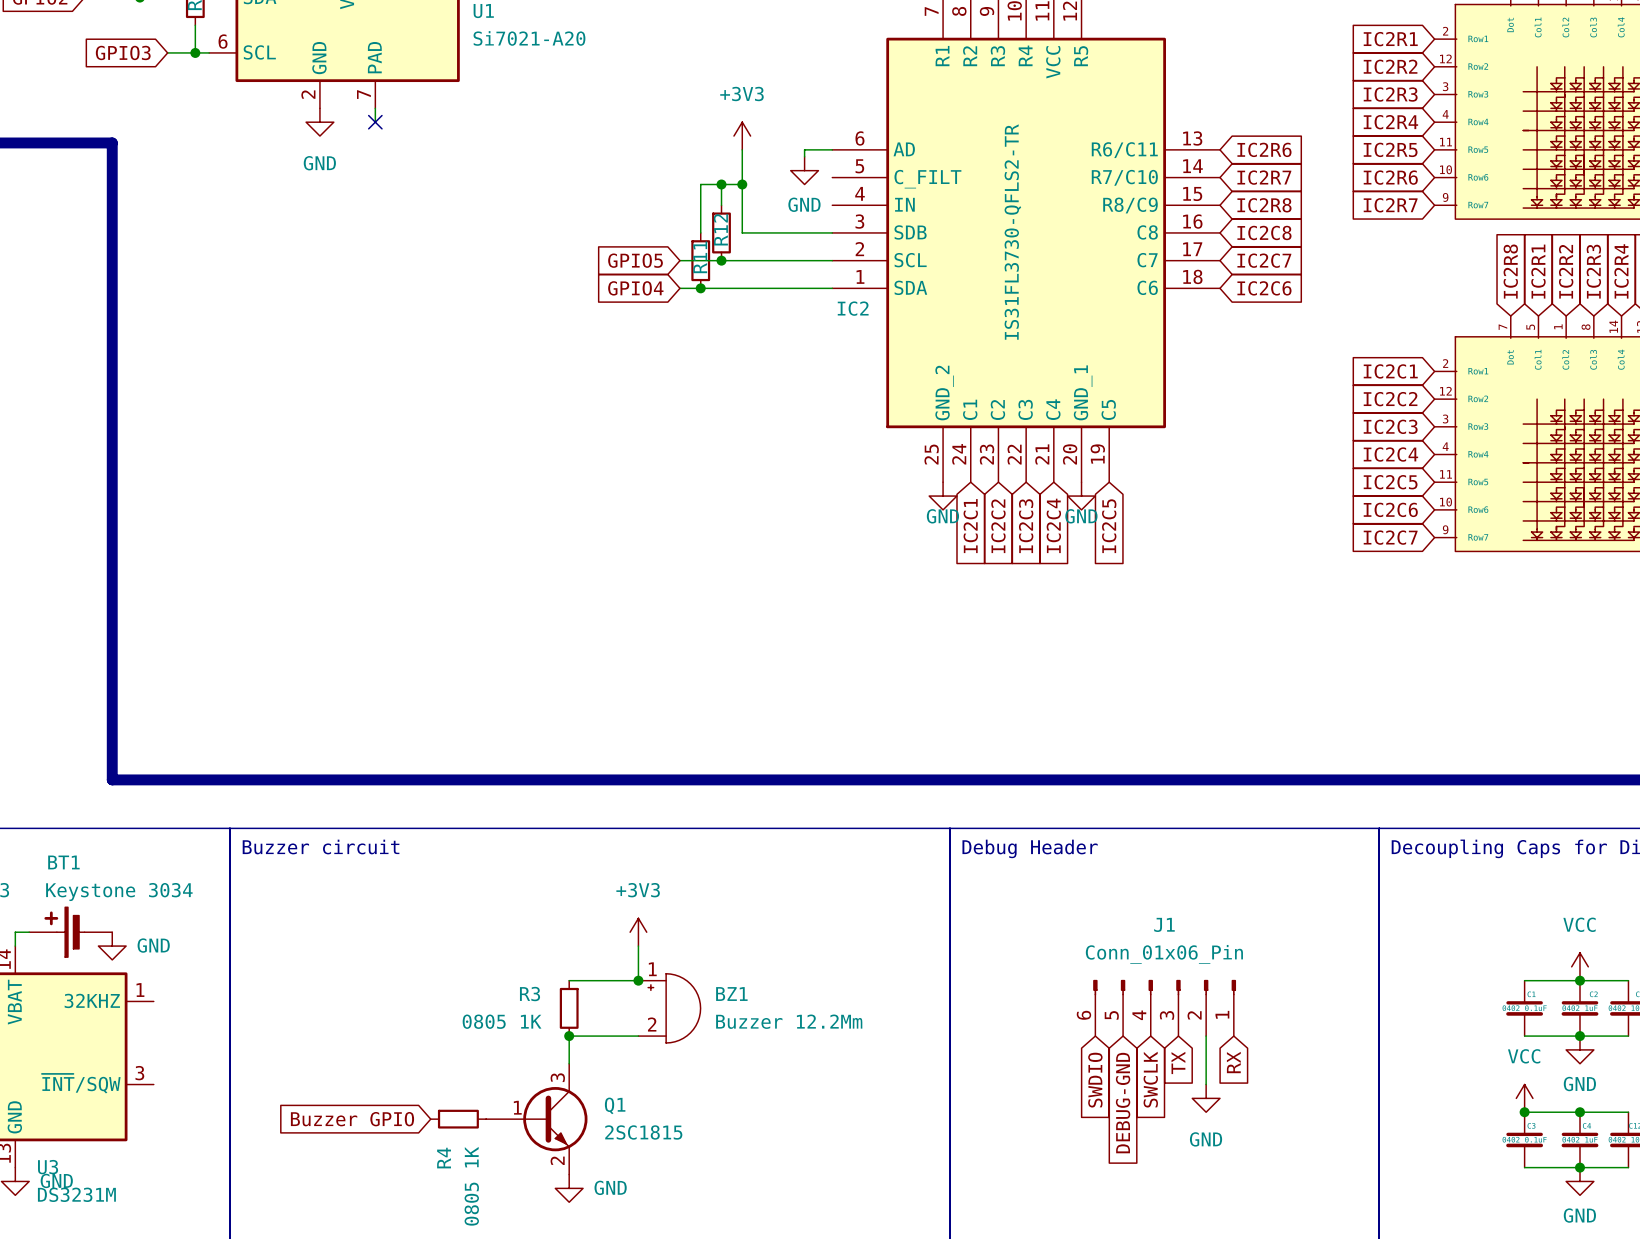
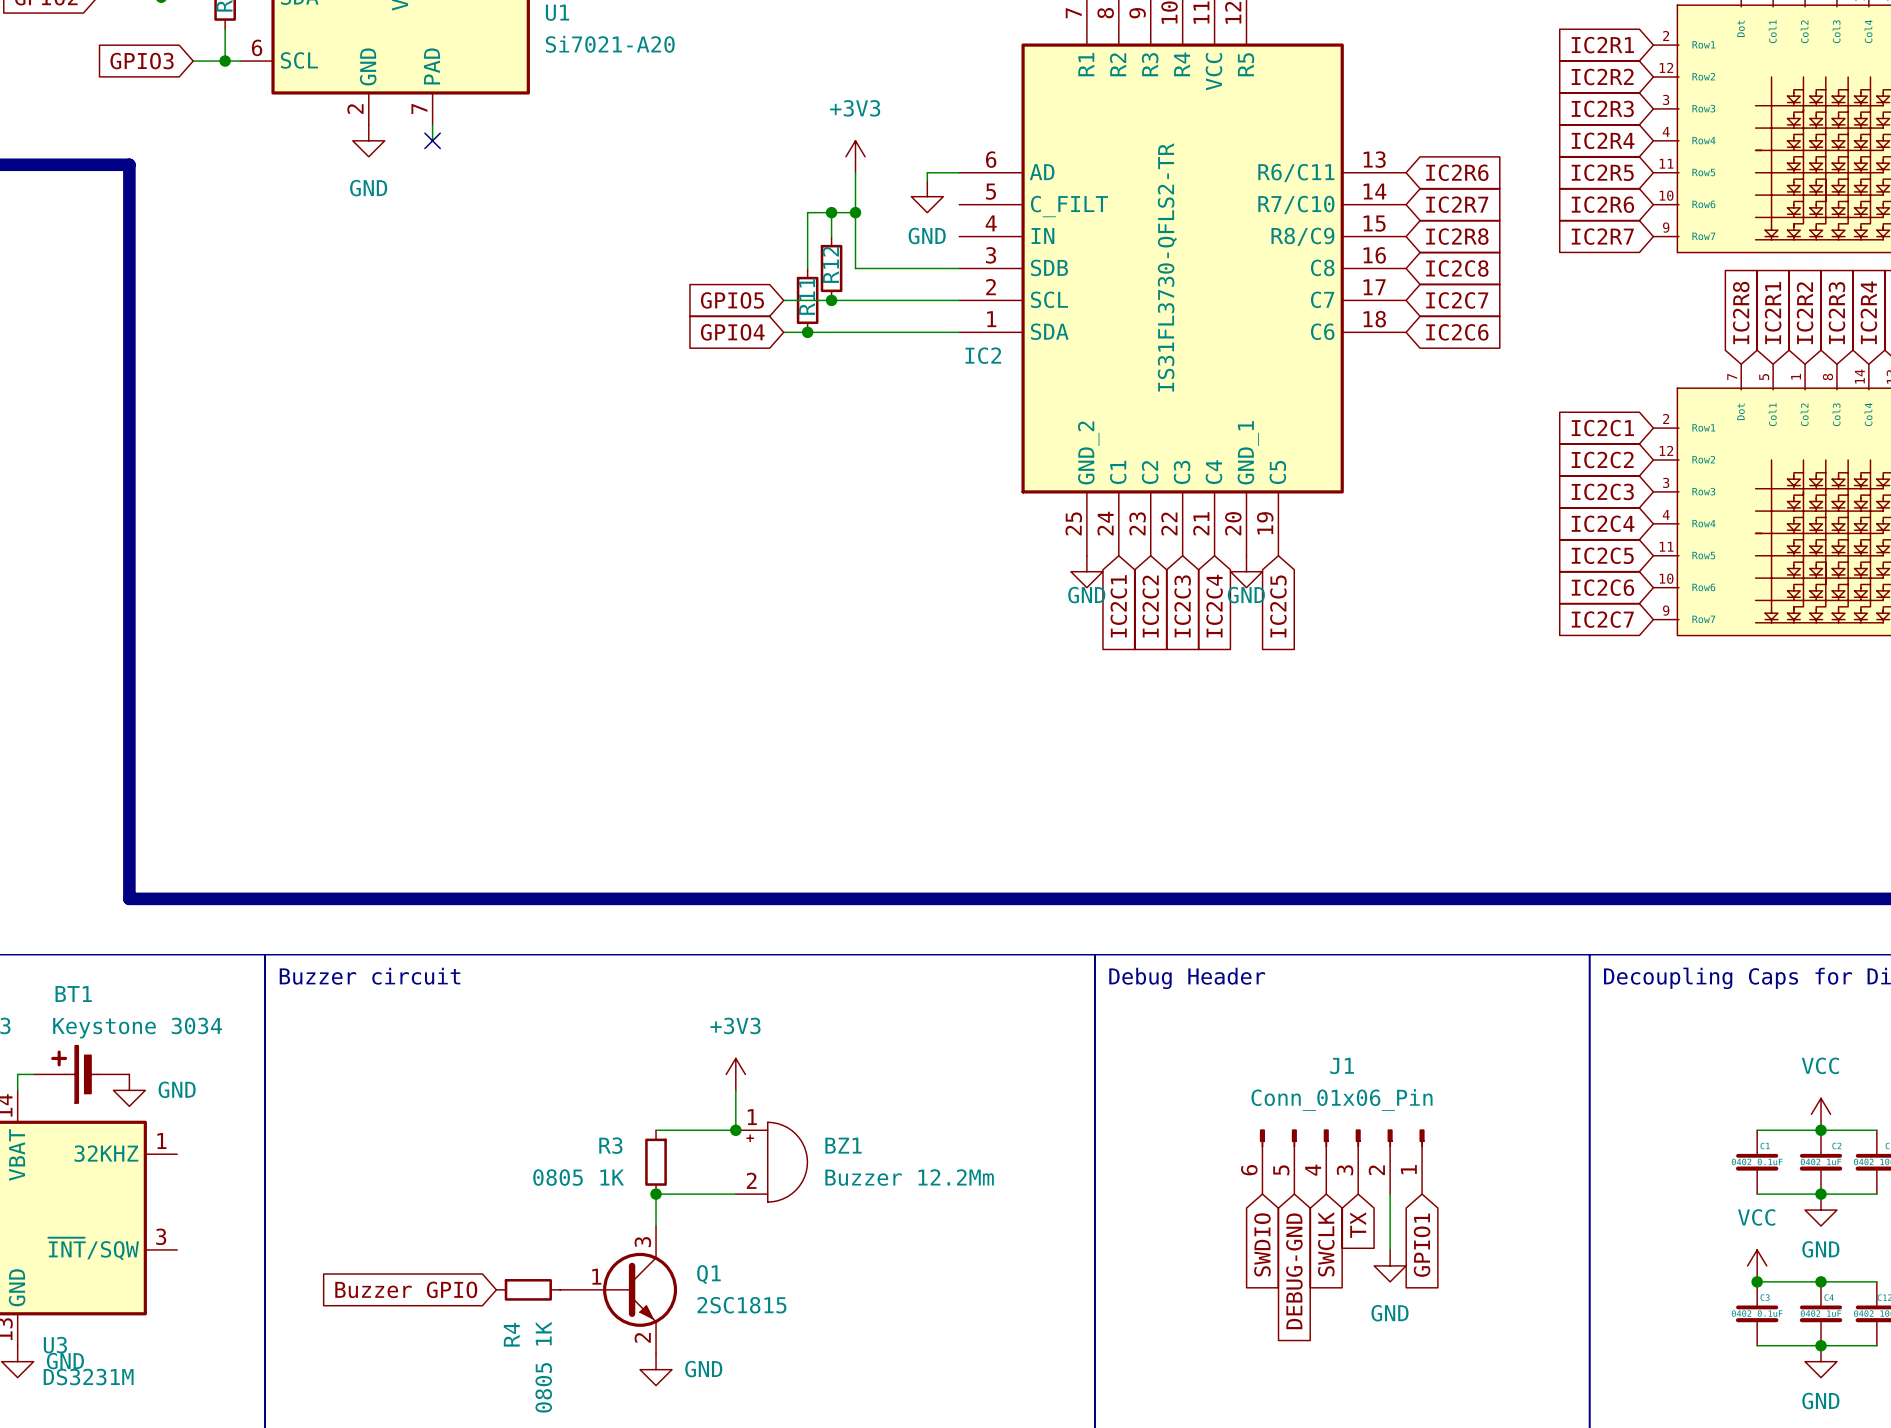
global label: RX (1233, 1062) -> GPIO1 (1422, 1245)

